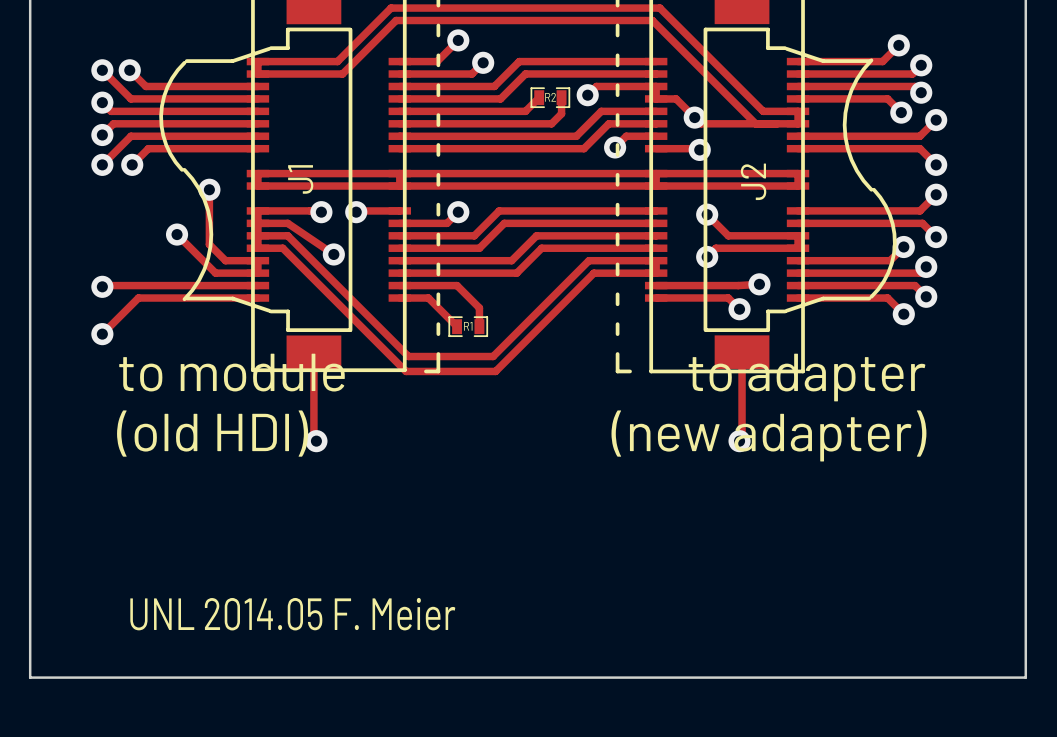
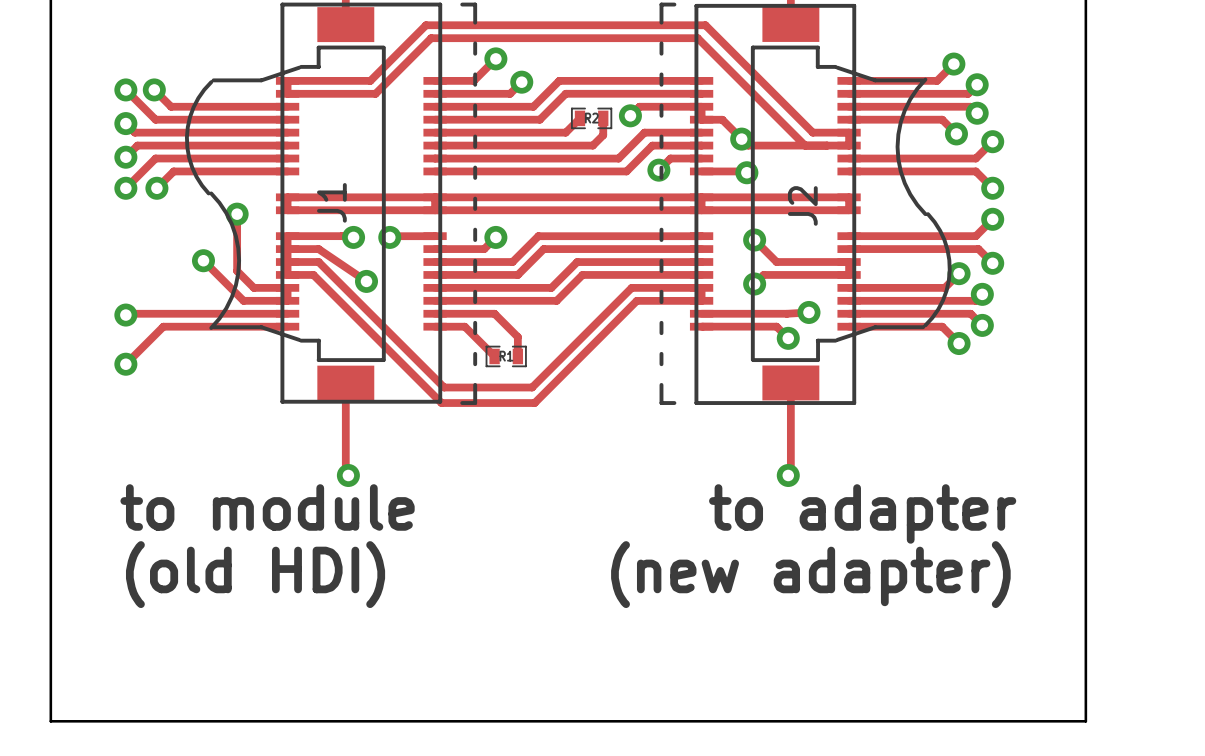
text position: to module (232, 372) -> to module (267, 507)
text position: to adapter (807, 377) -> to adapter (862, 513)
text position: (old HDI) (212, 433) -> (old HDI) (255, 574)
text position: (new adapter) (768, 435) -> (new adapter) (810, 574)
text: UNL 2014.05 F. Meier (292, 614) -> none

